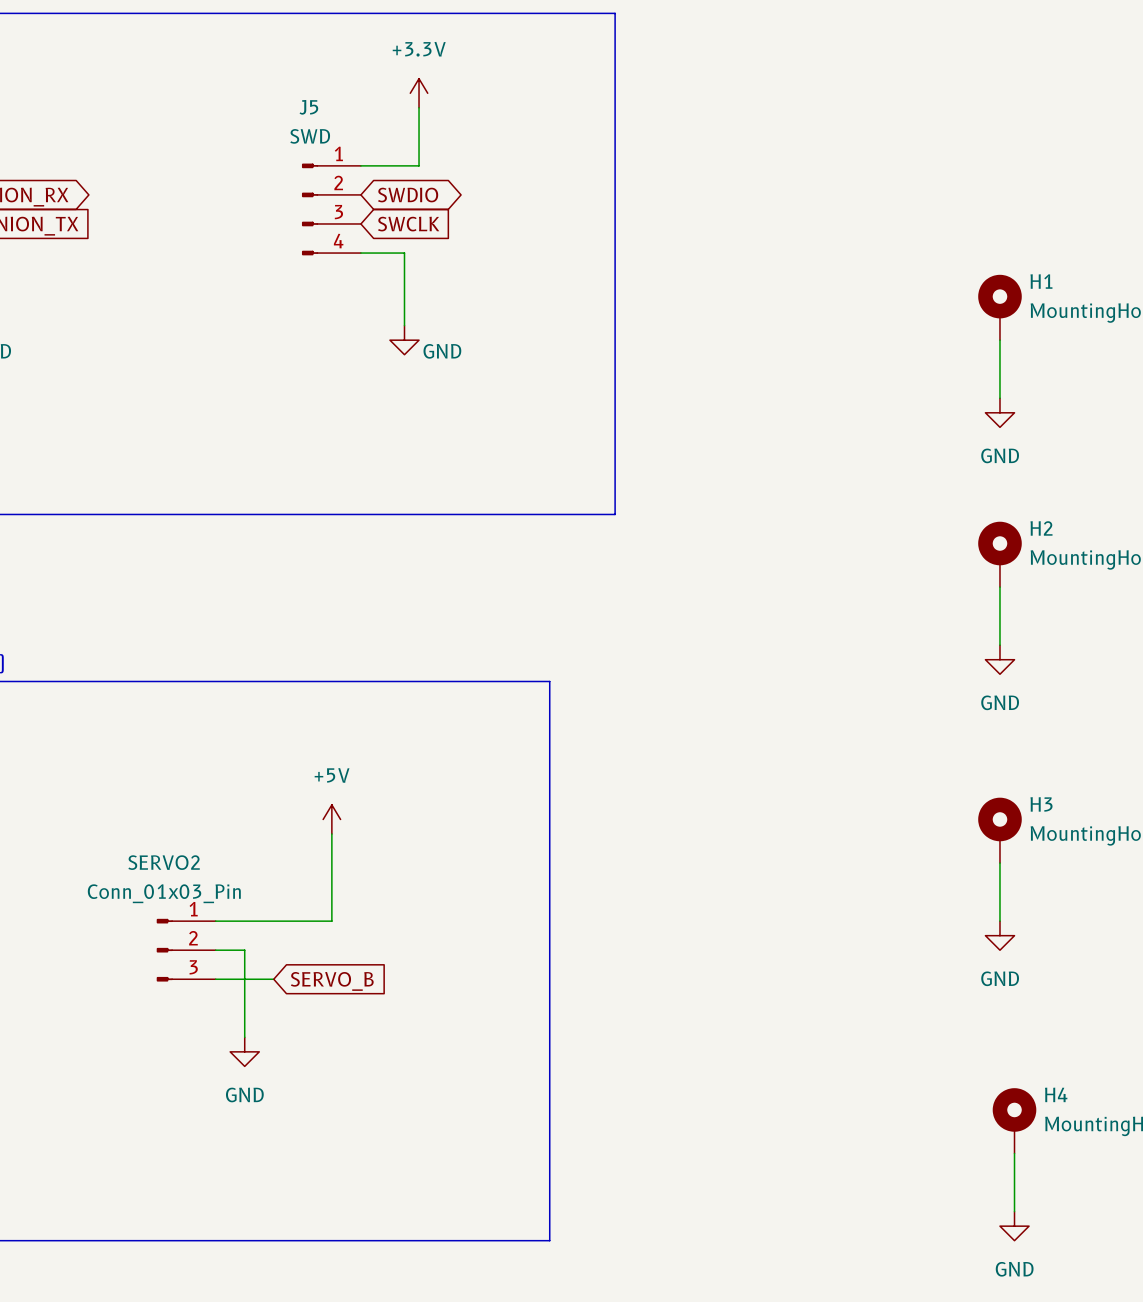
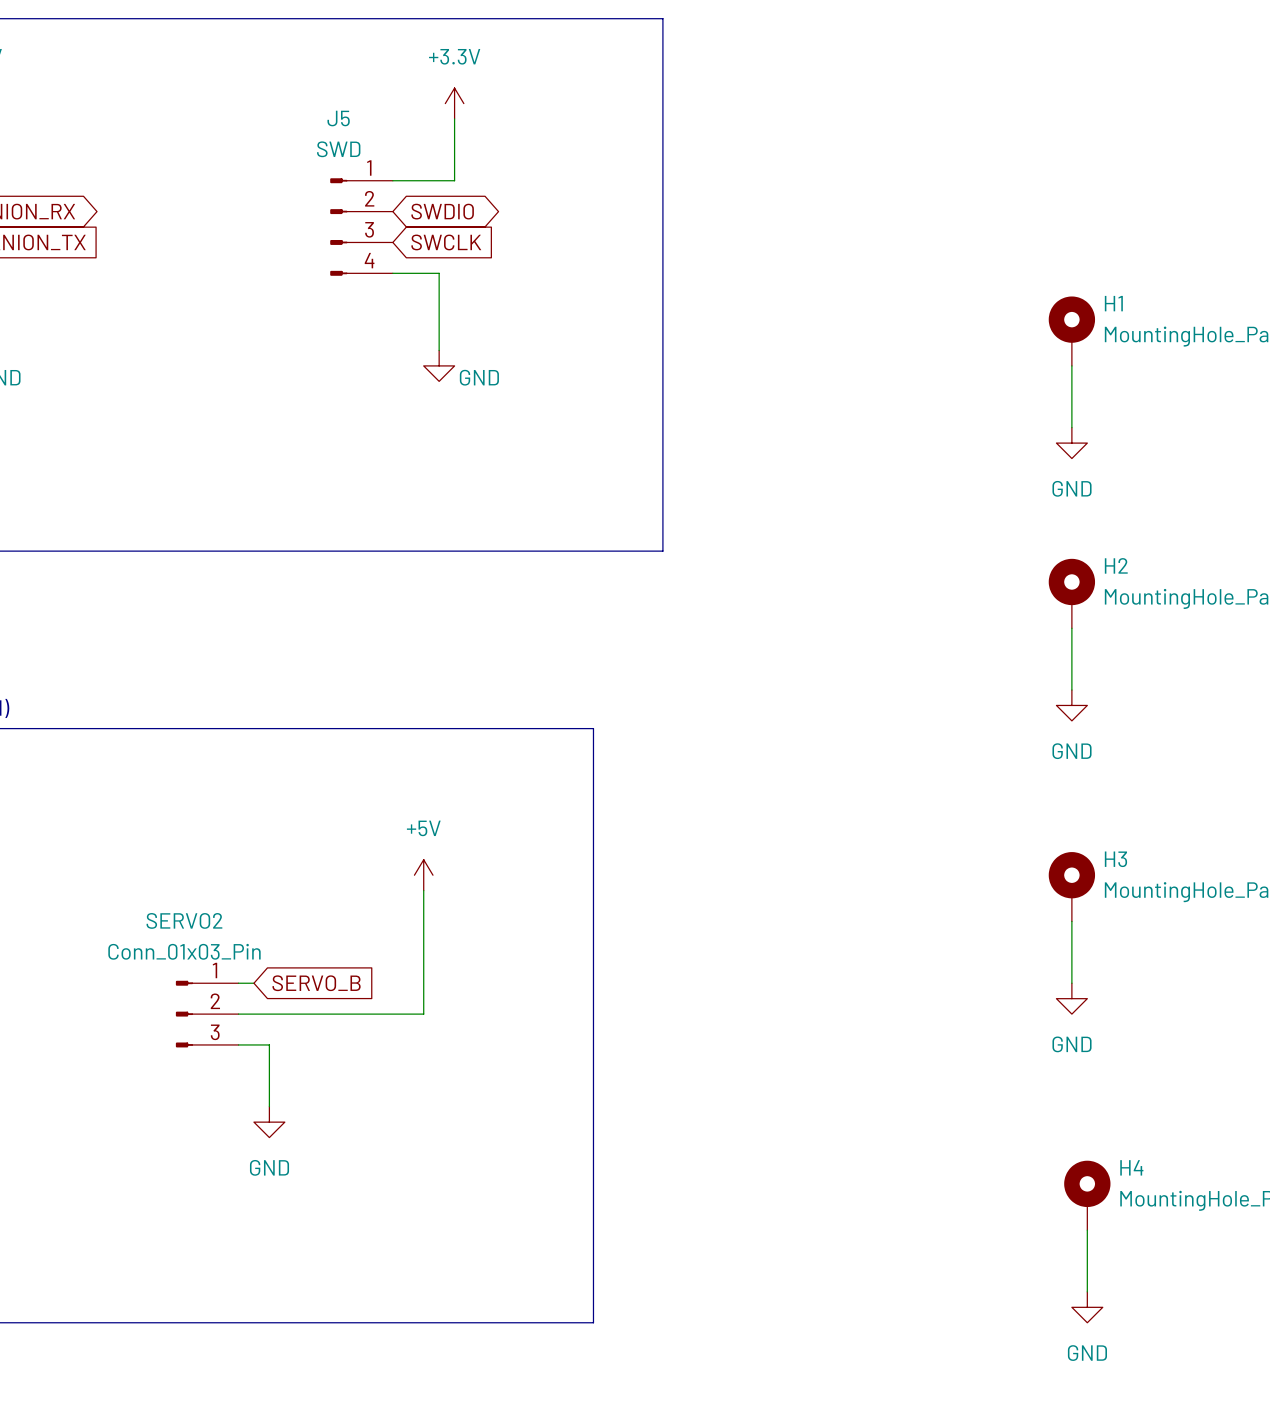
power symbol position: +5V (331, 819) -> +5V (423, 875)
wire: (331, 834) (331, 921) (230, 921) -> none
wire: (244, 950) (244, 979) (273, 979) -> (269, 1014) (423, 1014) (423, 890)
global label position: SERVO_B (332, 981) -> SERVO_B (316, 983)

